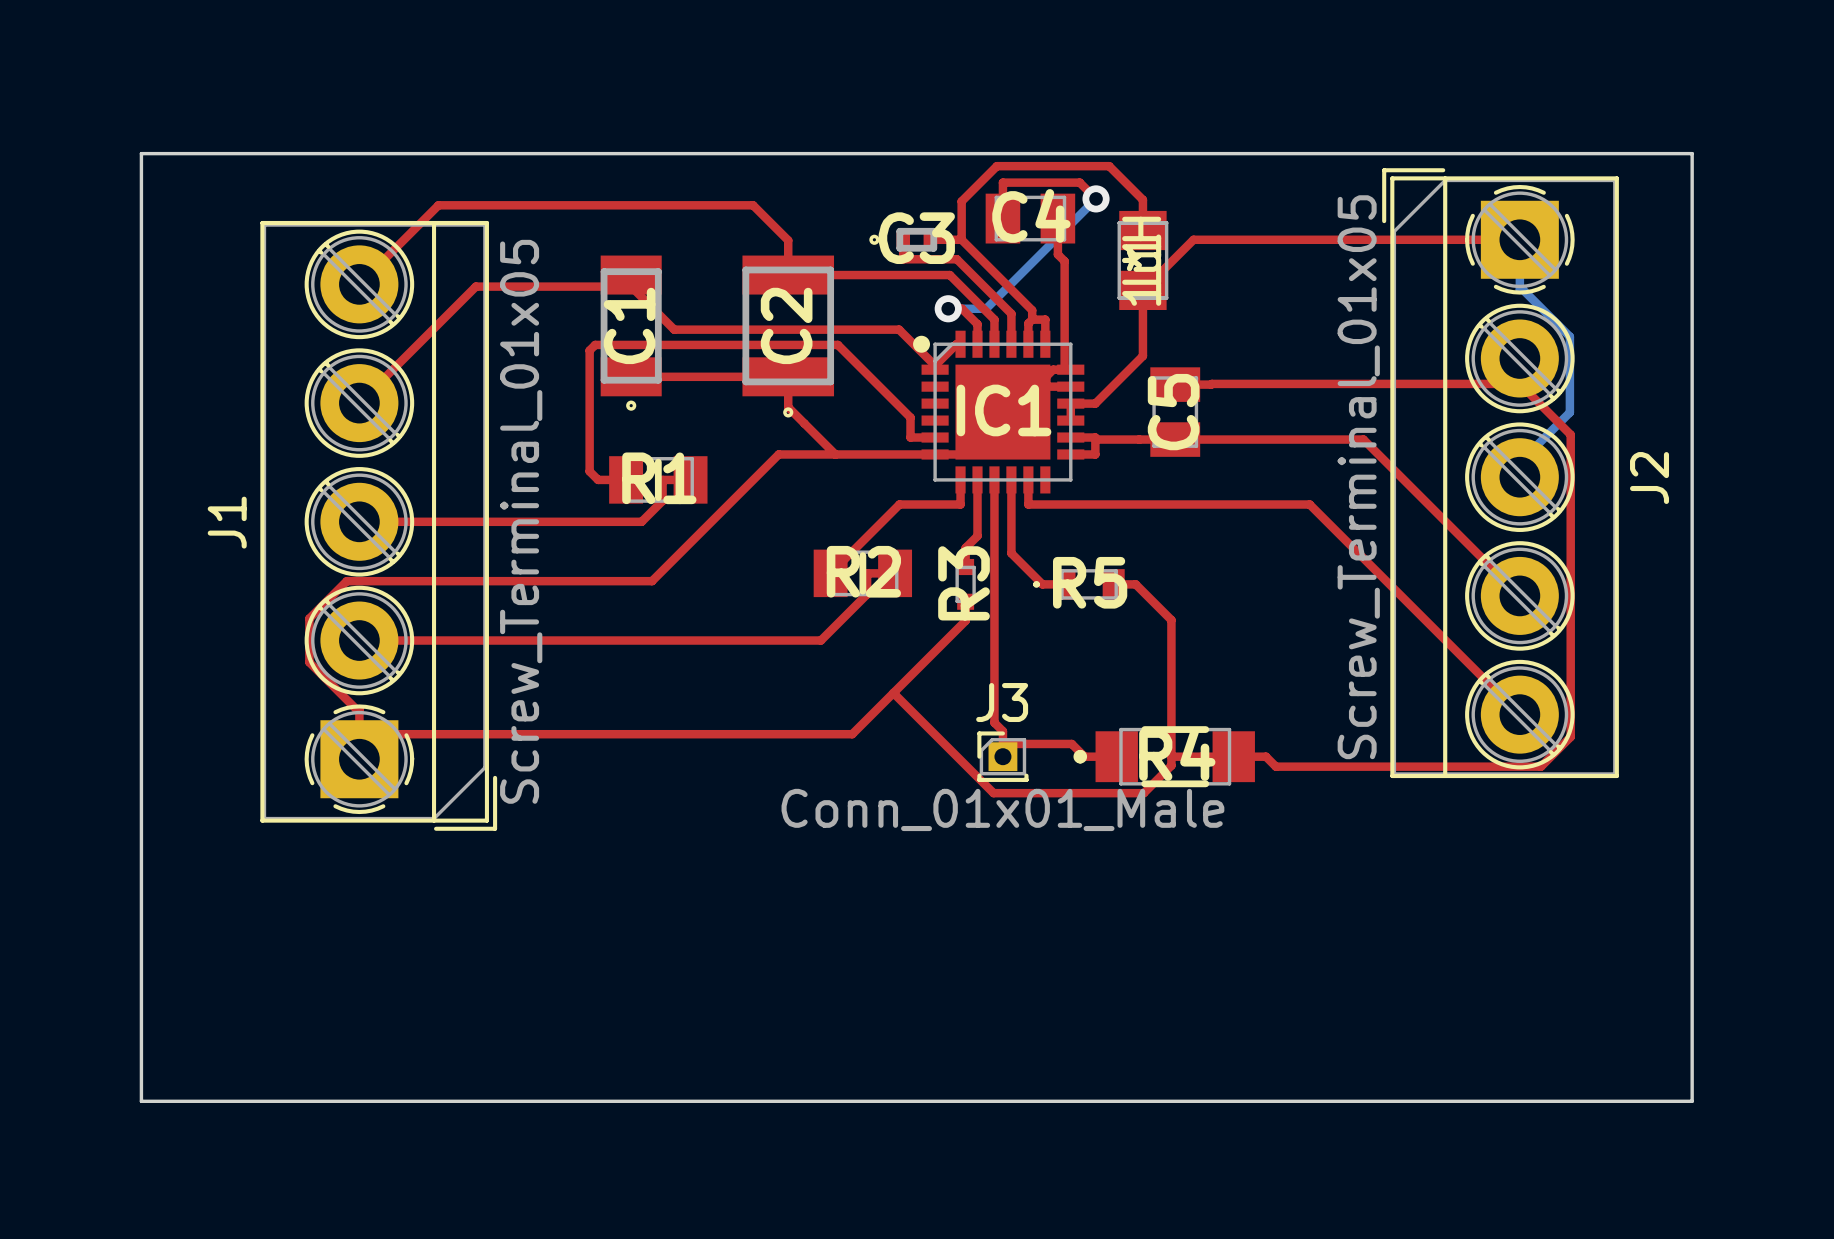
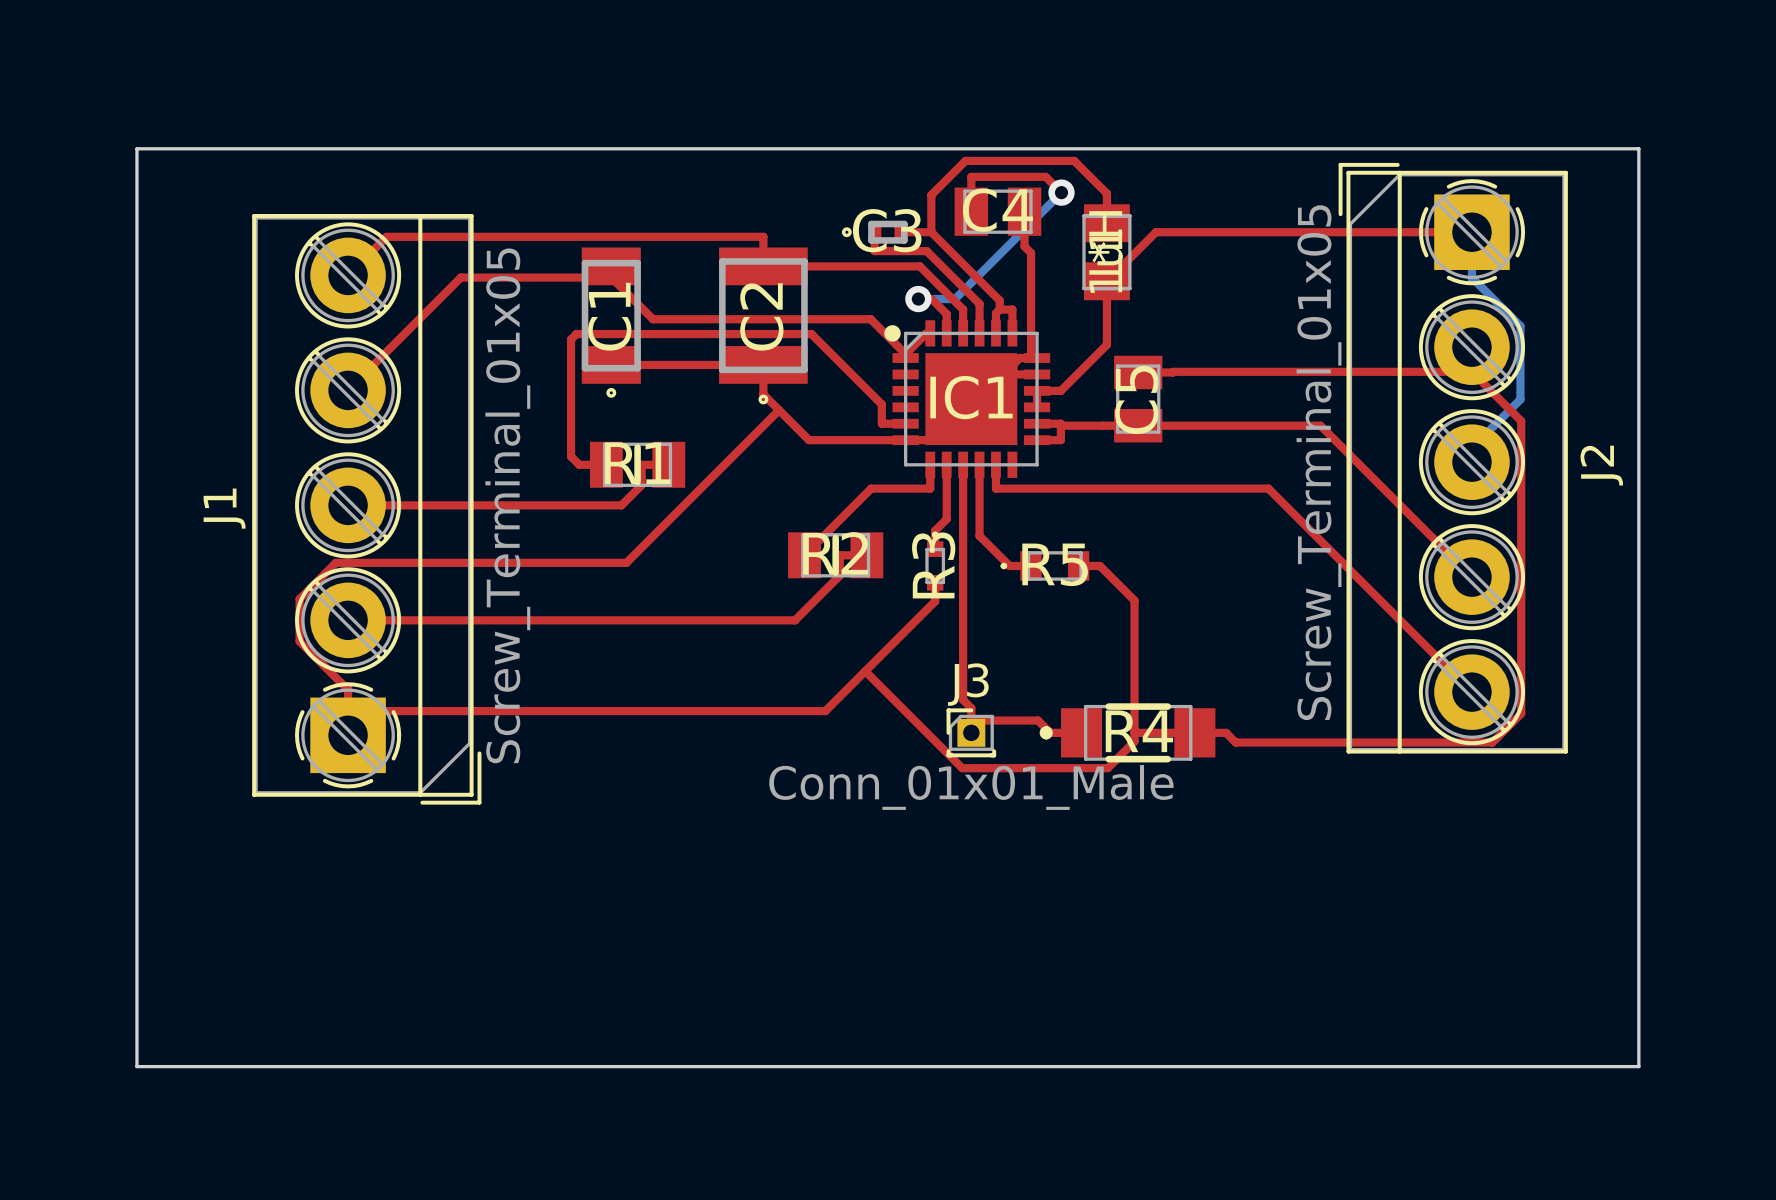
top track: (399, 244) (438, 205) (753, 205) (788, 240) (788, 244) -> (386, 236) (763, 236)
top track: (835, 454) (778, 454) (652, 581) (646, 581) -> (779, 410) (626, 562)

